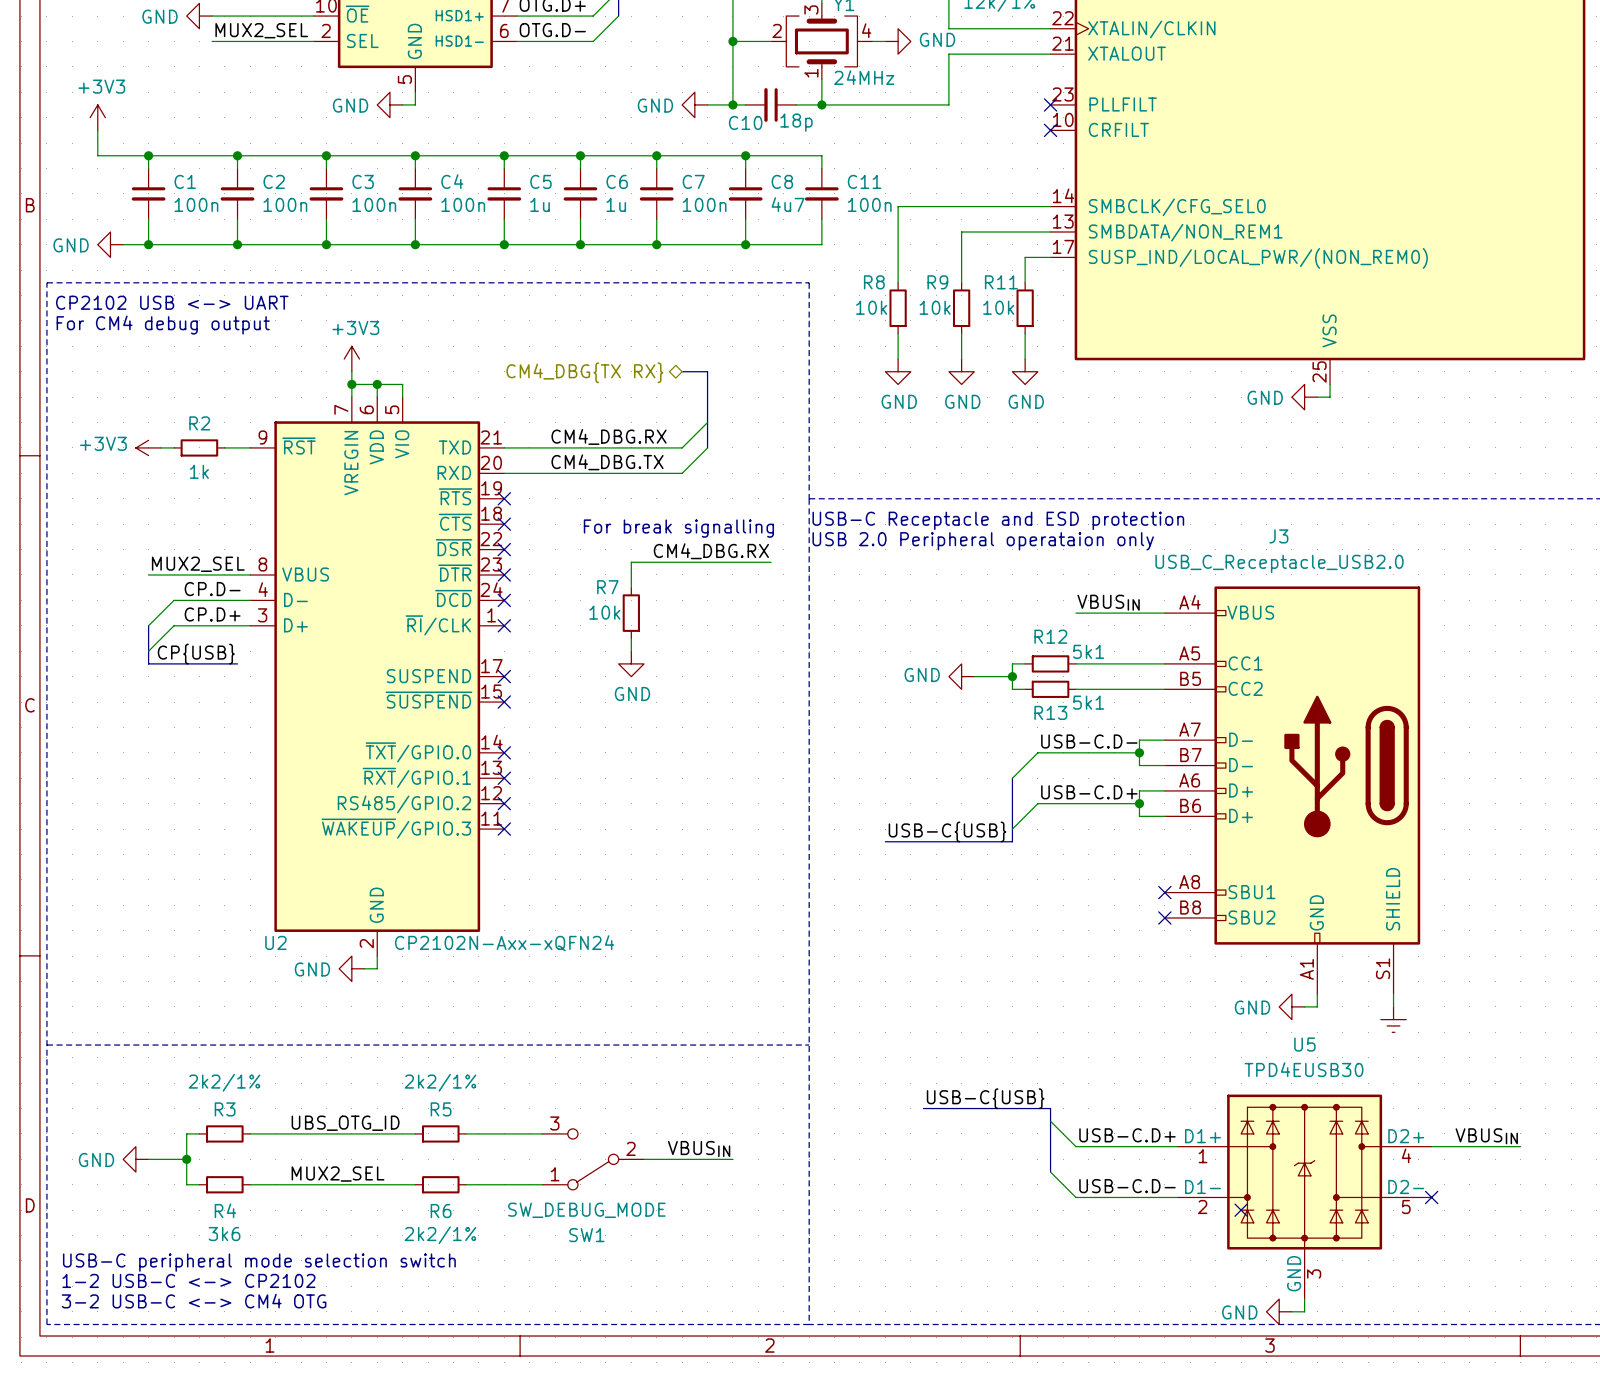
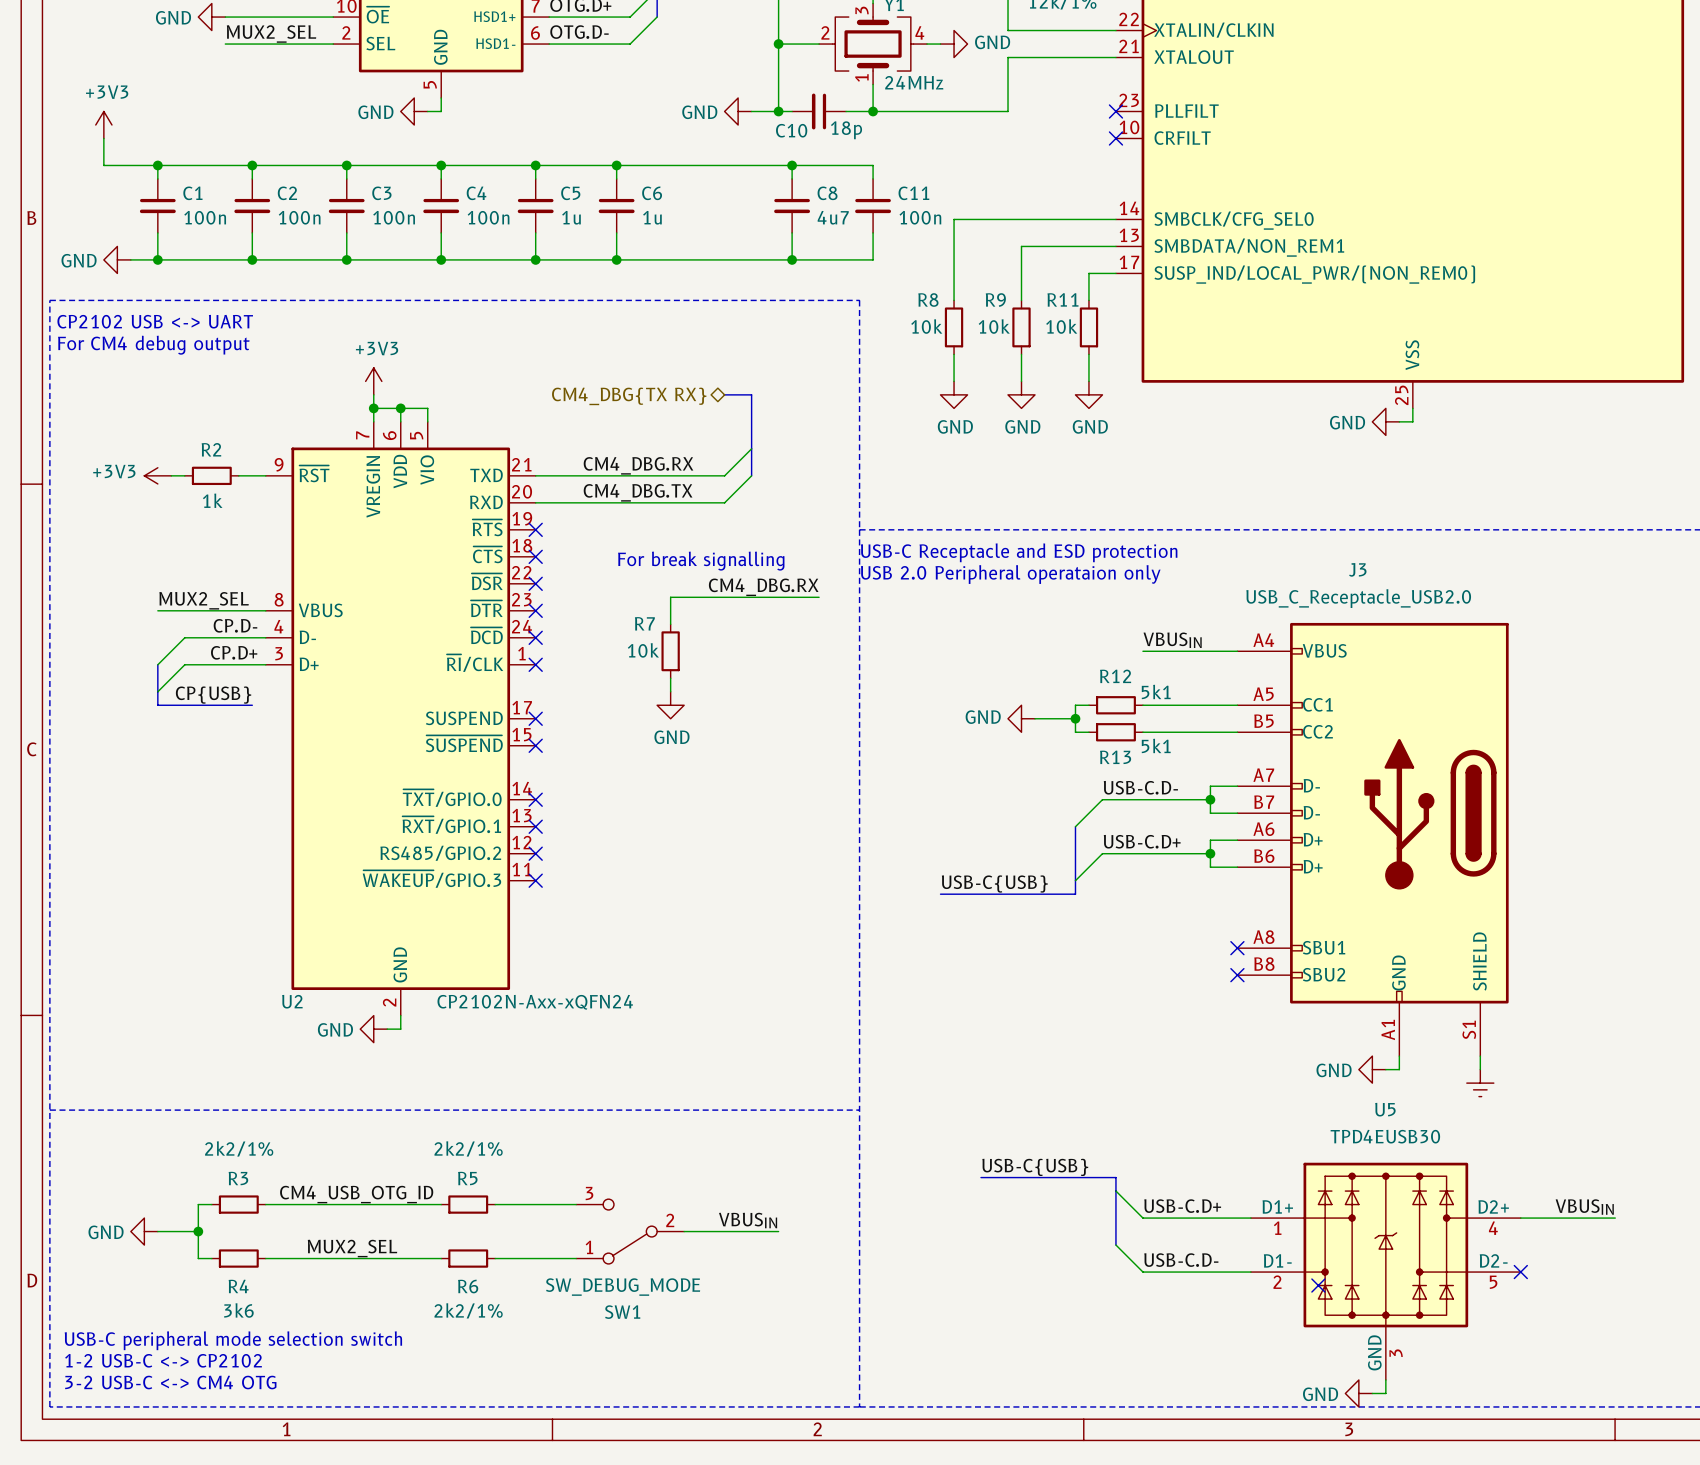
wire: (656, 155) (656, 168) -> none
junction: (656, 155) -> none
C7: 100n (656, 193) -> none
wire: (656, 219) (656, 244) -> none
junction: (656, 244) -> none
label: UBS_OTG_ID (345, 1123) -> CM4_USB_OTG_ID (356, 1194)

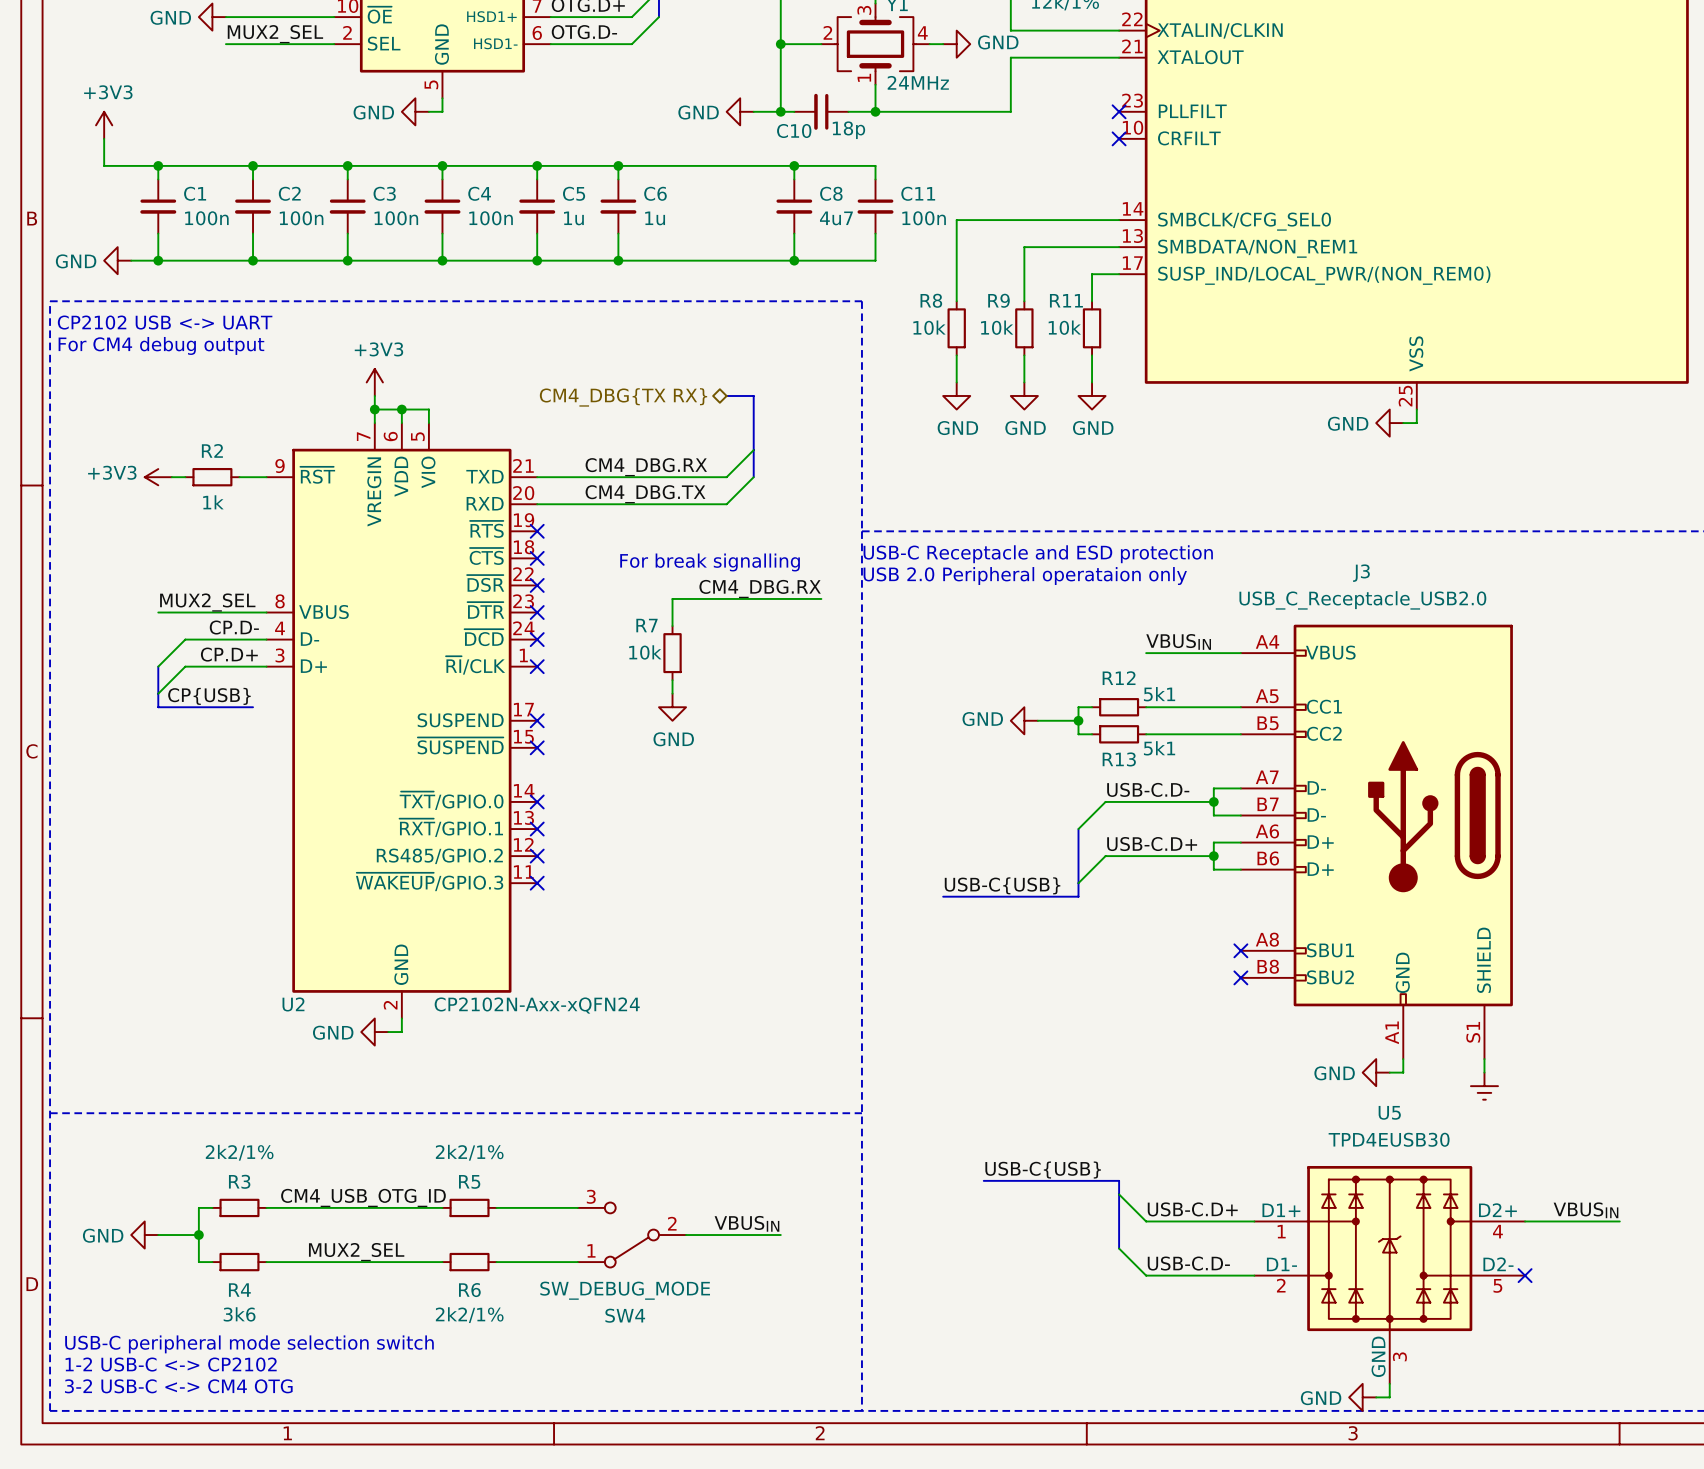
no-connect mark: (1318, 1285) -> none
SW1 name: SW1 (622, 1312) -> SW4 (625, 1315)

